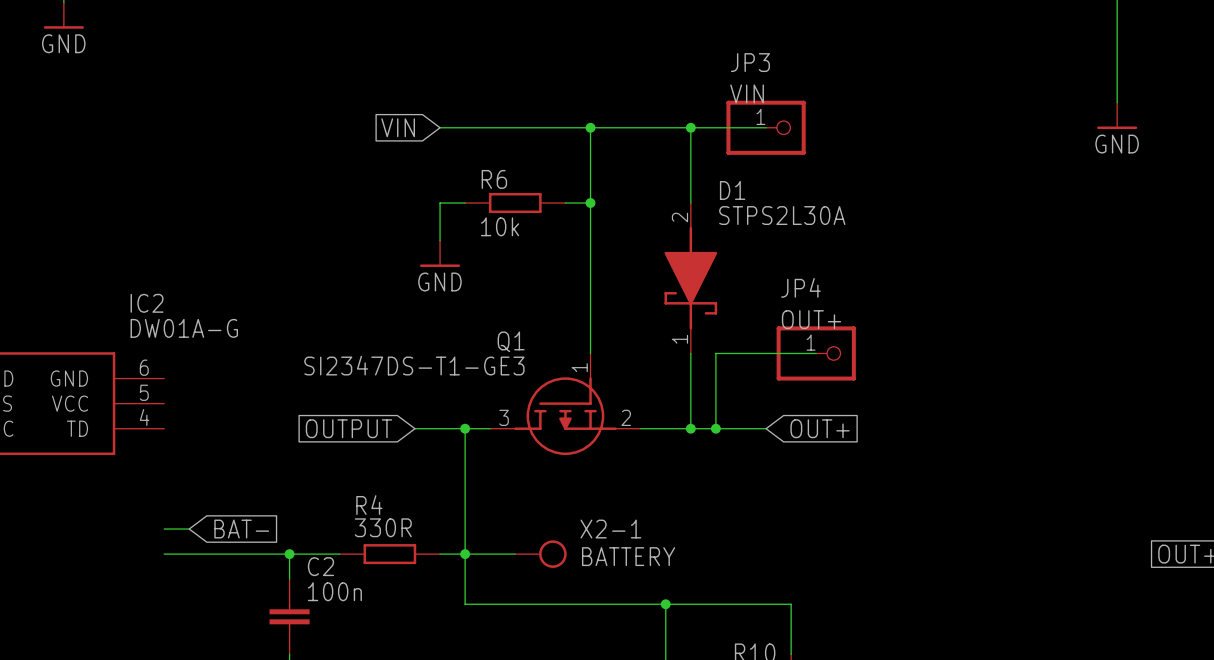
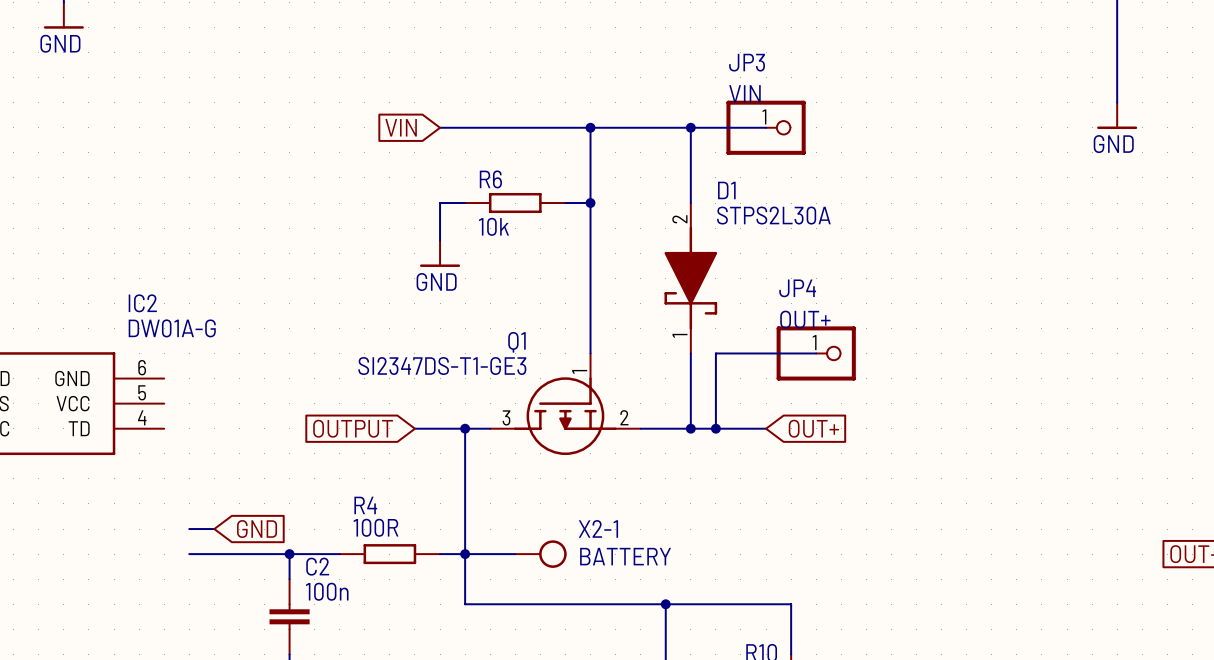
R4 value: 330R (383, 527) -> 100R (375, 527)
wire: (164, 529) (189, 529) -> (214, 529) (189, 529)
global label: BAT- (241, 529) -> none
global label: none -> GND (257, 529)
wire: (164, 554) (189, 554) -> none

